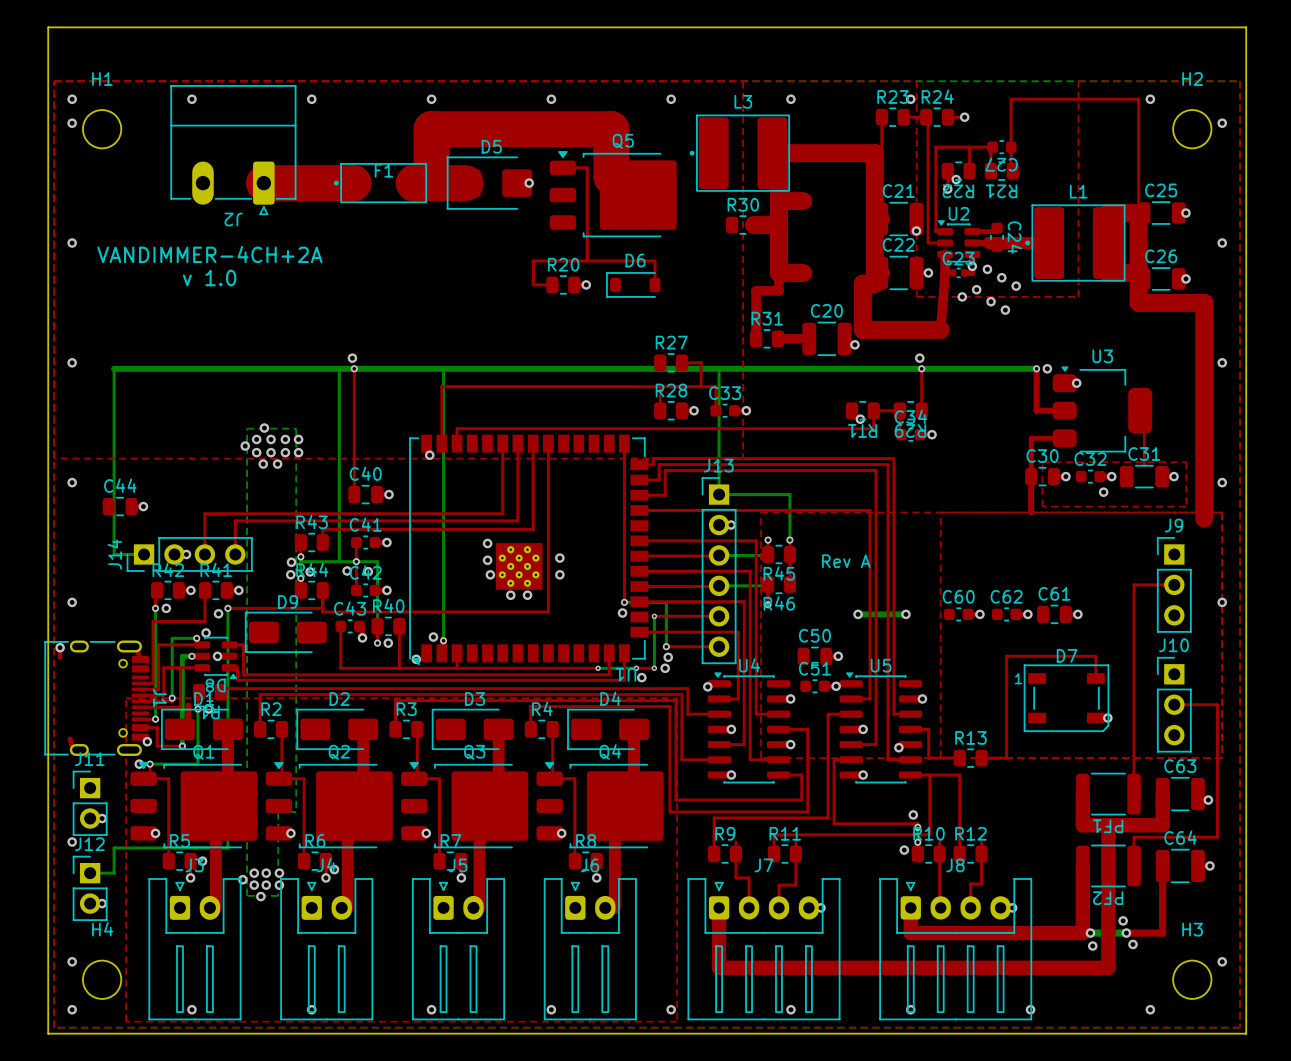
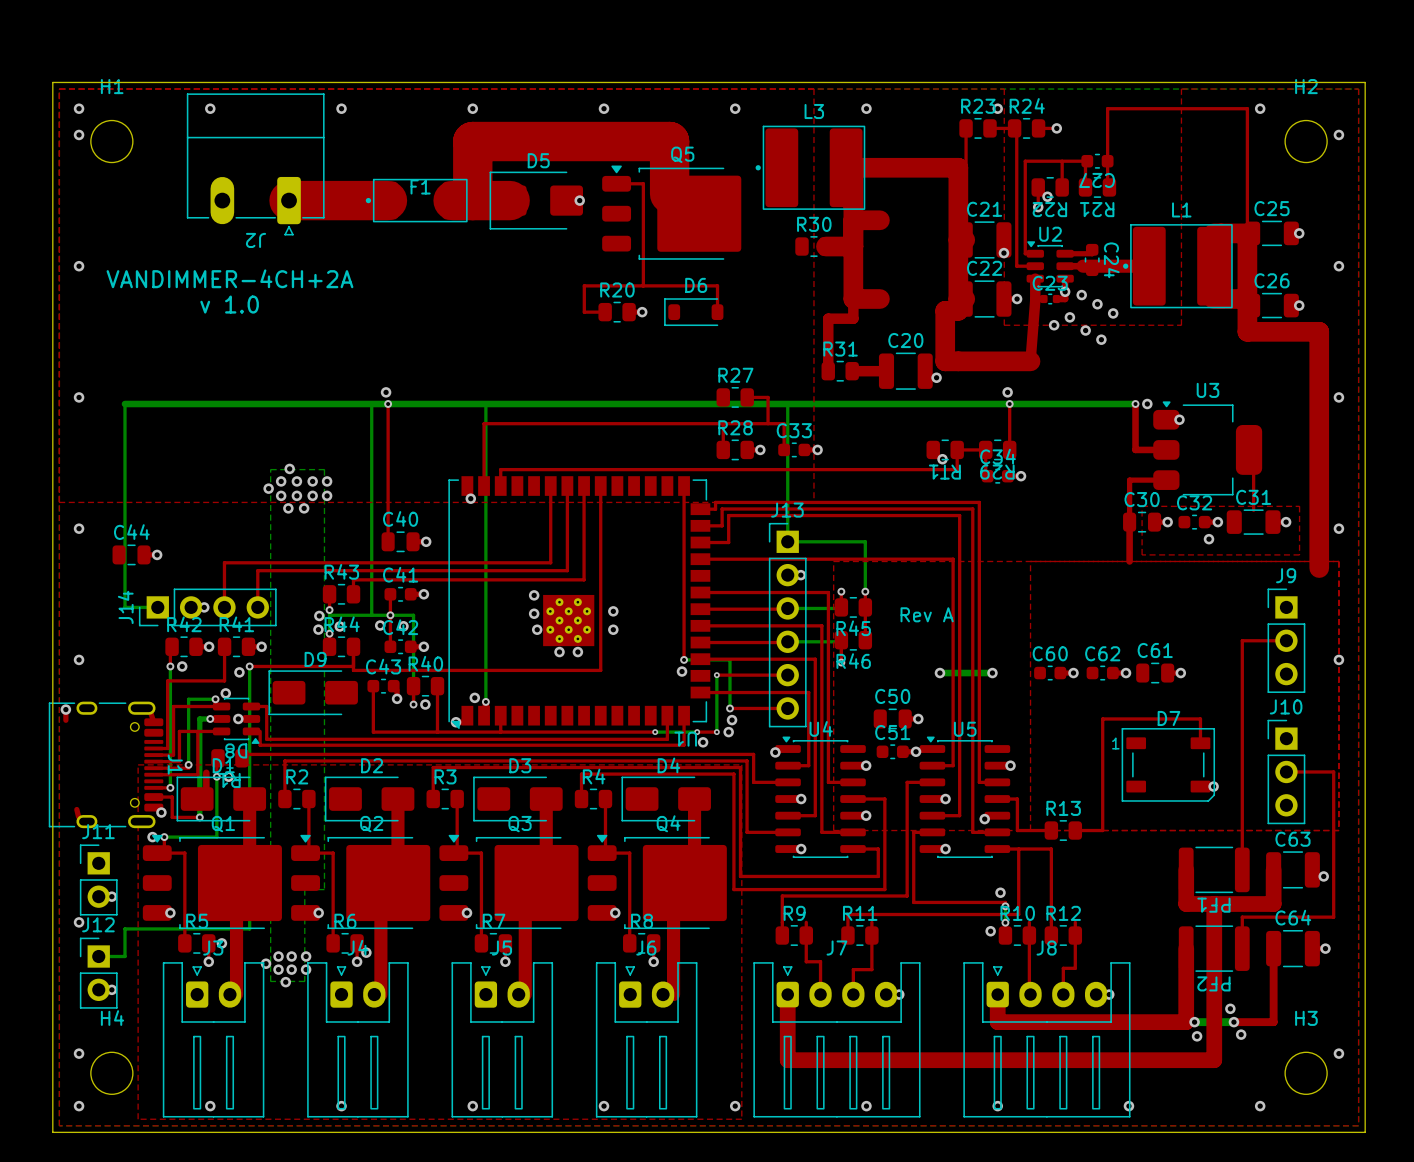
board edge: (48, 75) (48, 27) (1246, 27) (1246, 75) -> (52, 82) (1365, 82)

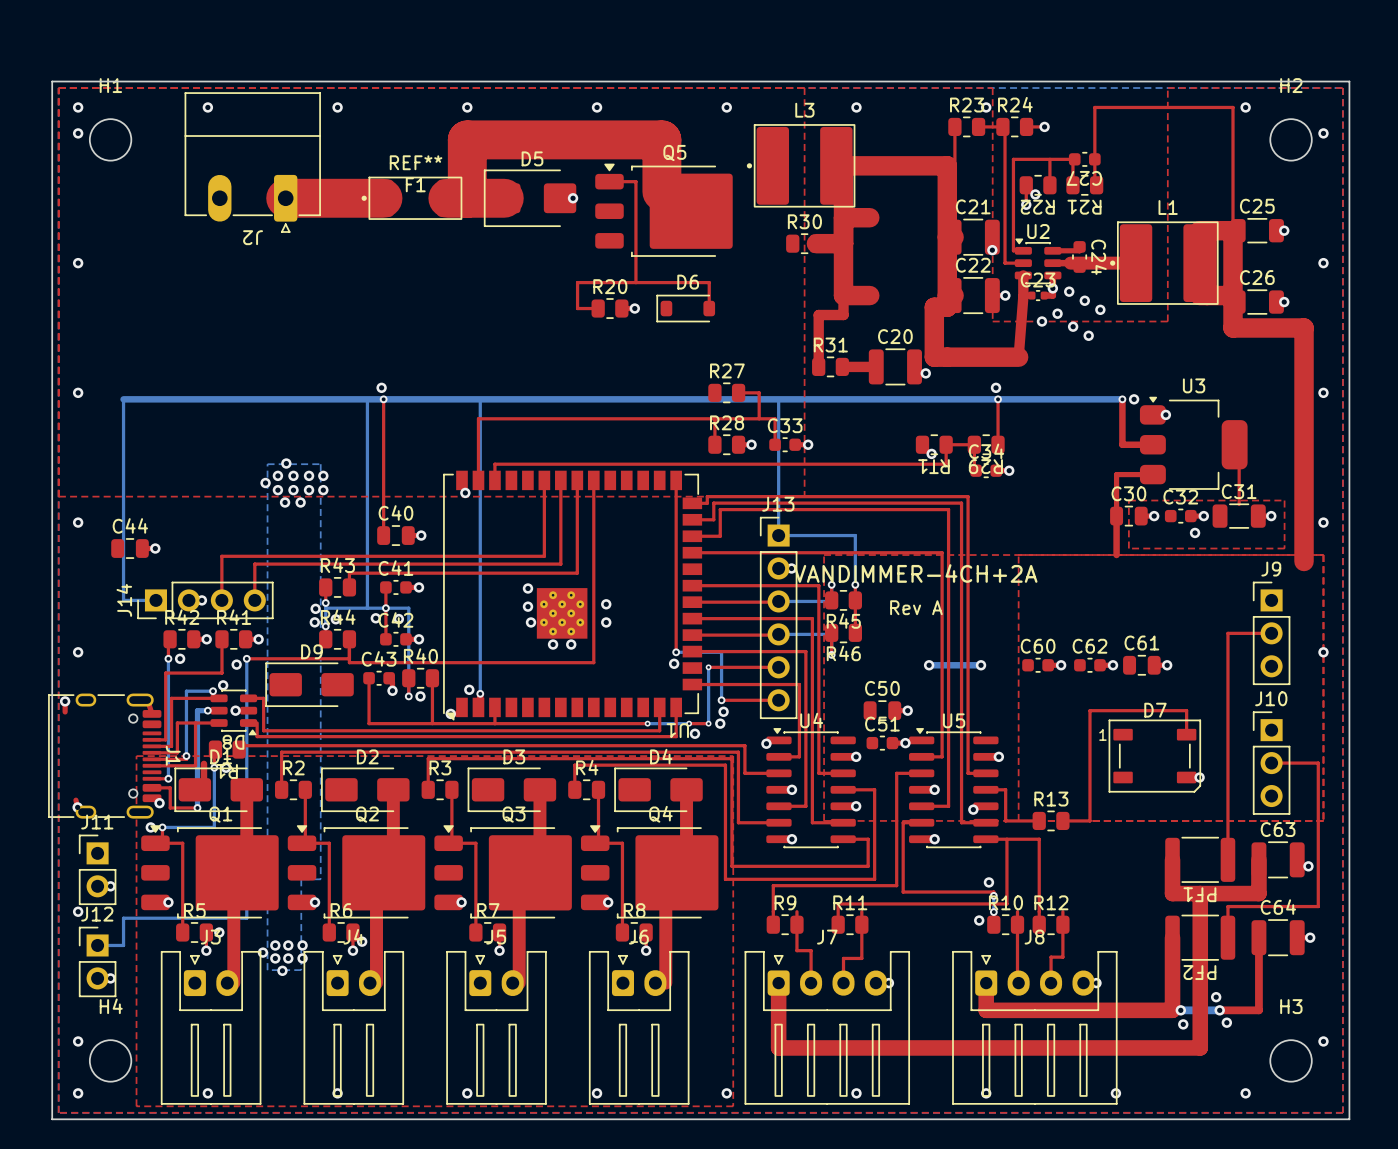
F1 text: none -> REF** (416, 162)
text: VANDIMMER-4CH+2A (229, 278) -> none
text: v 1.0 (229, 304) -> none
text: none -> VANDIMMER-4CH+2A (915, 573)
via: none -> (77, 807)

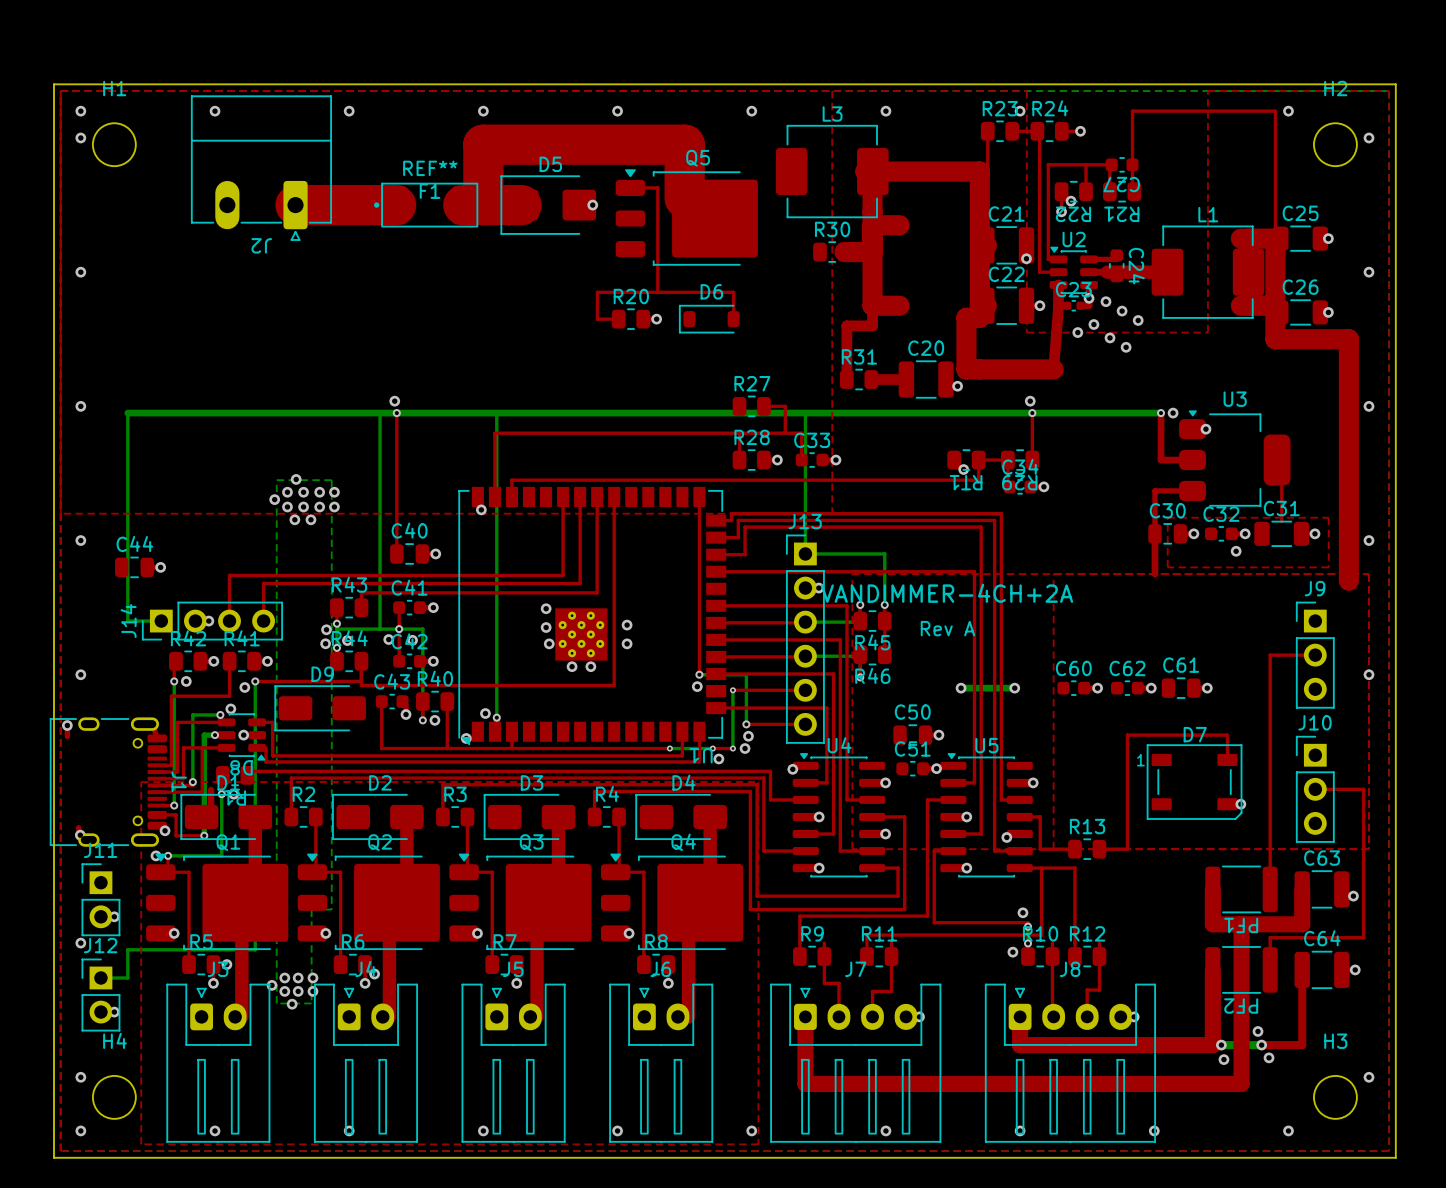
L3 footprint: [746, 124, 856, 208] -> [775, 124, 889, 219]
L1 footprint: [1110, 221, 1219, 305] -> [1151, 225, 1265, 319]

